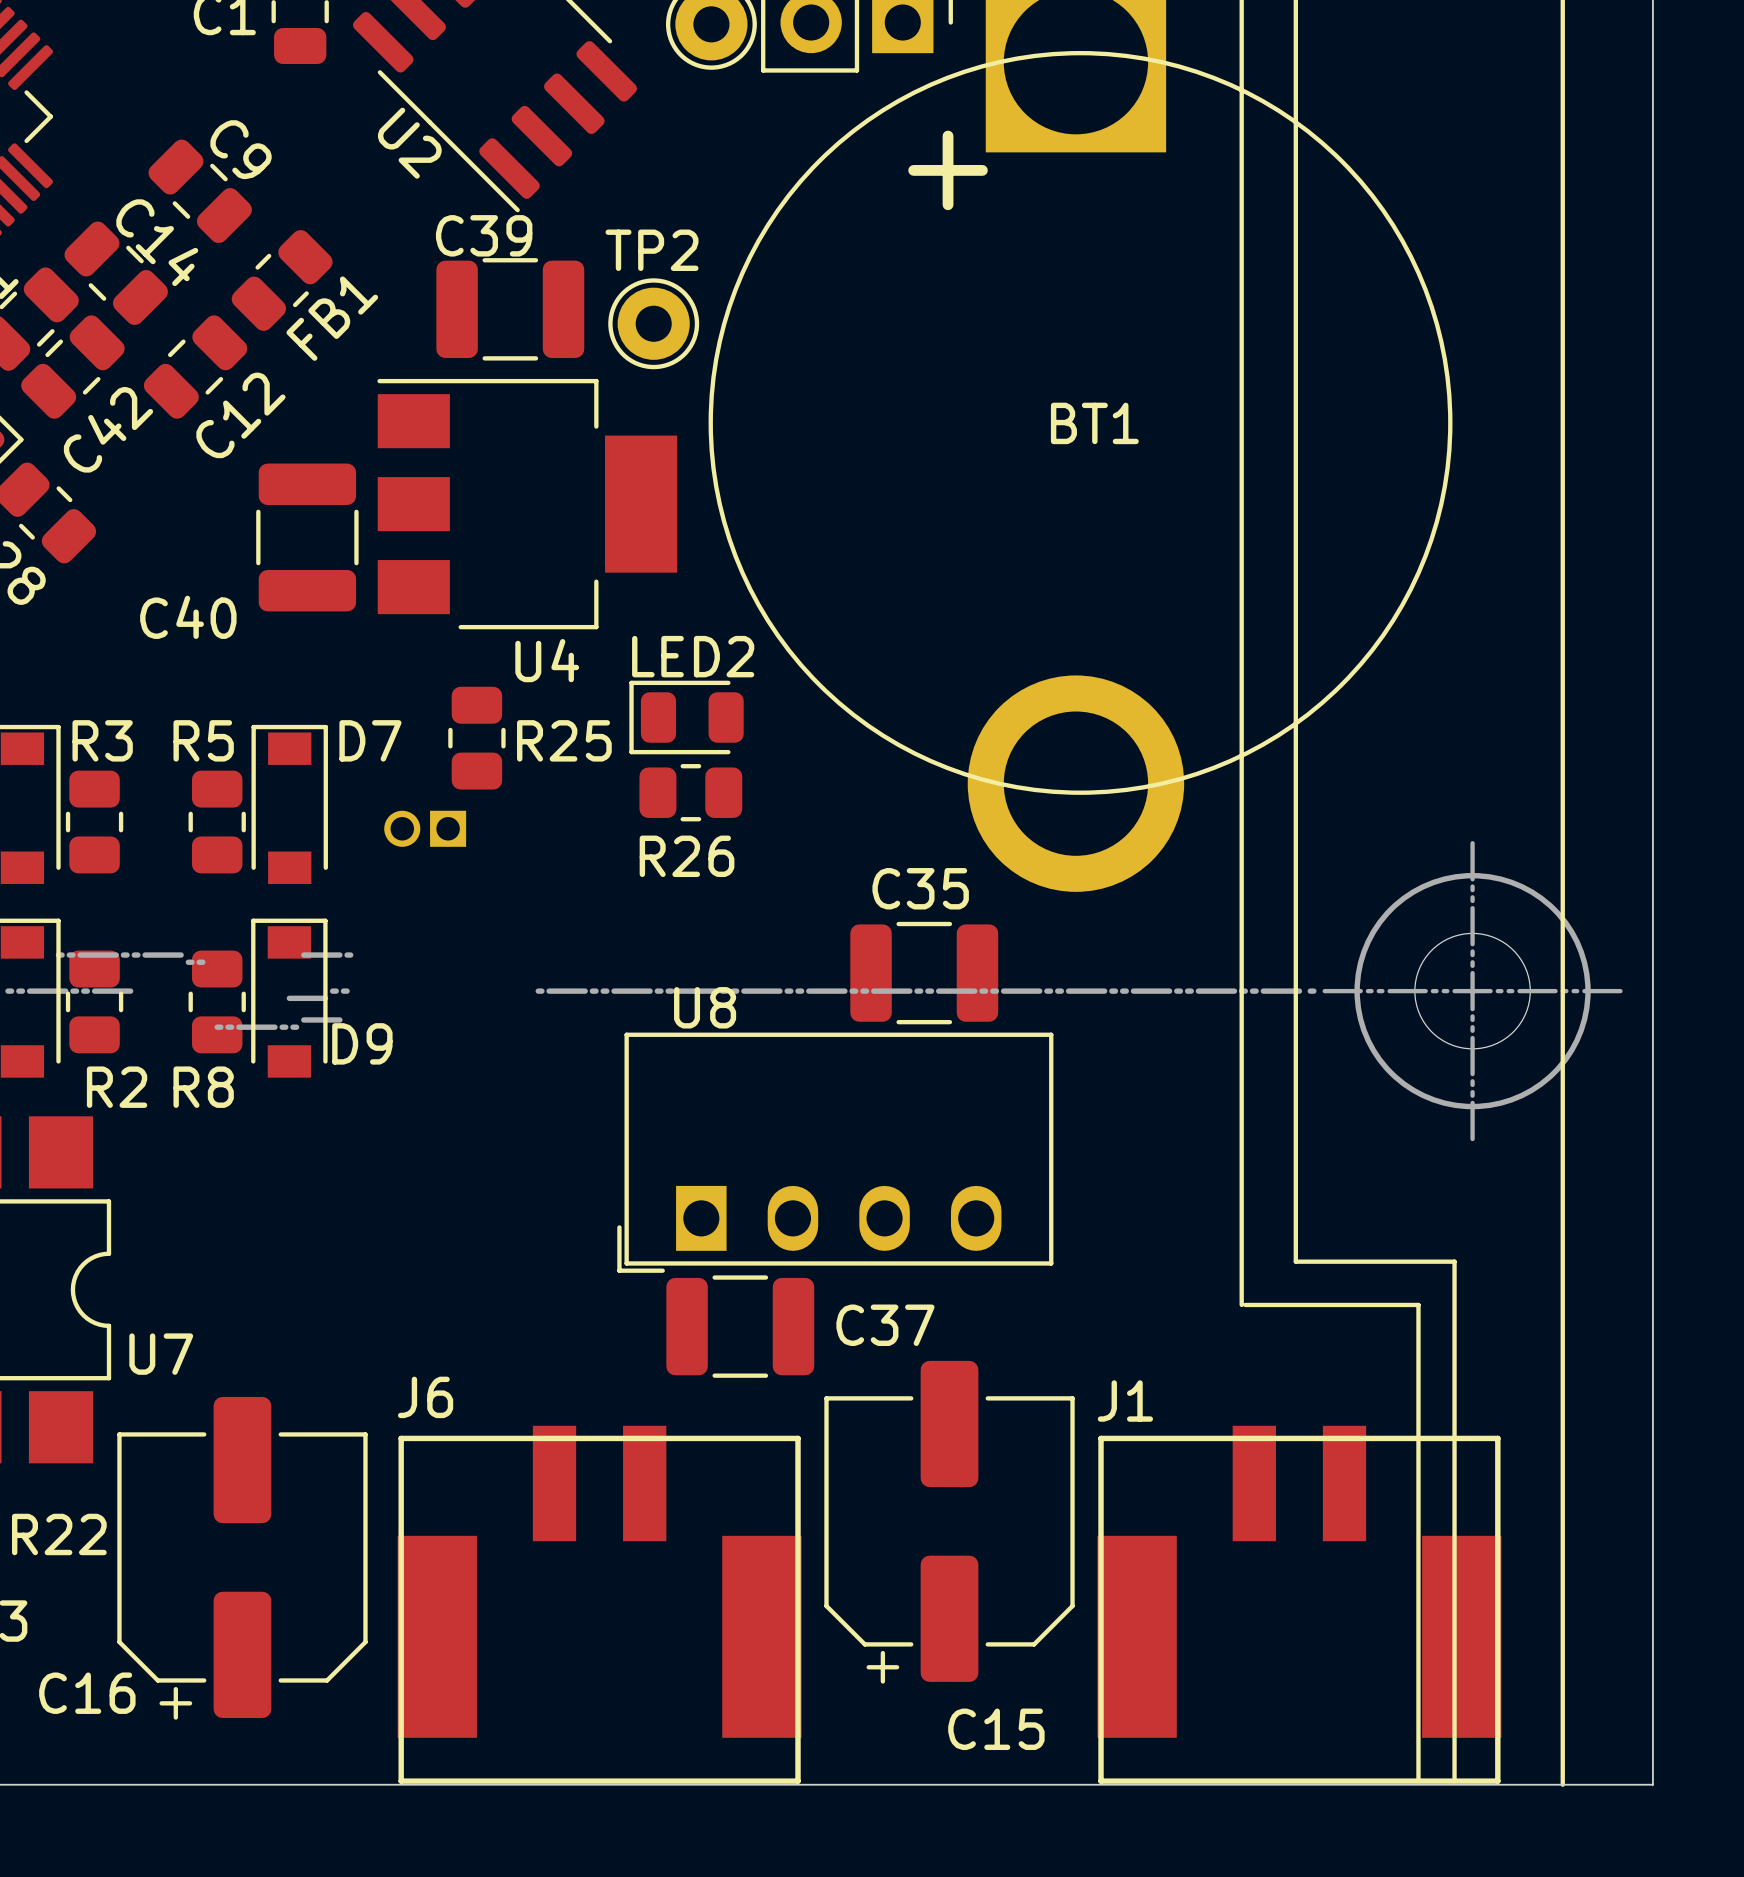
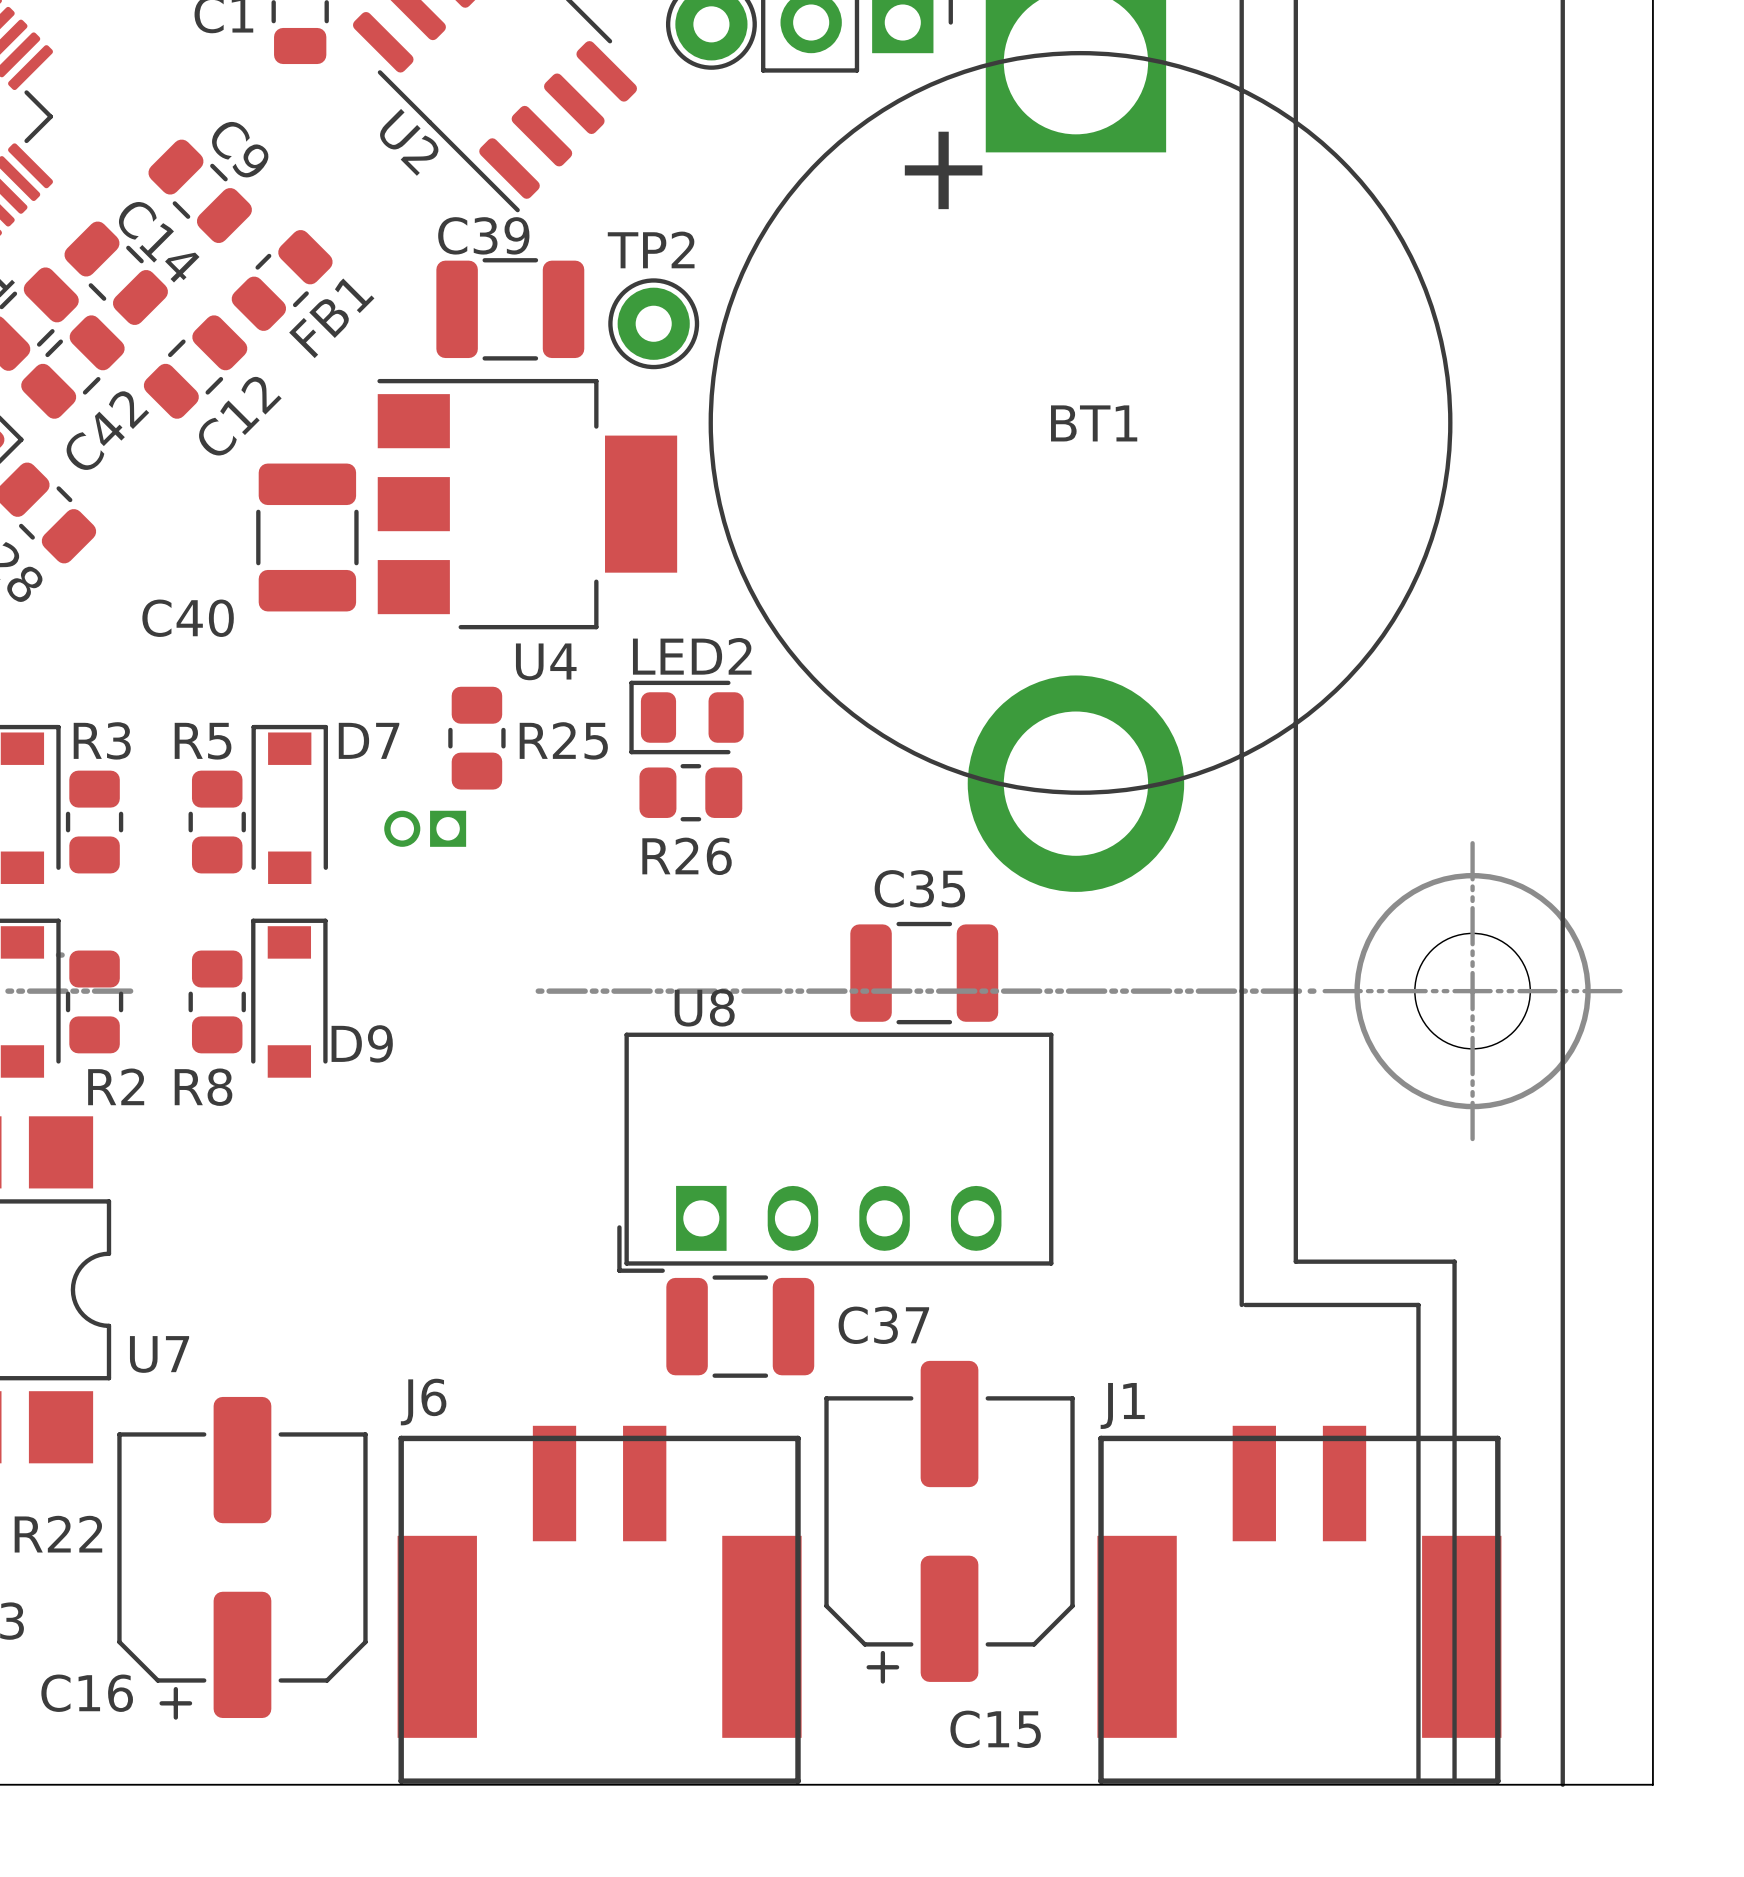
line: (69, 955) (72, 955) -> none
line: (80, 955) (116, 955) -> none
line: (123, 955) (127, 955) -> none
line: (134, 955) (137, 955) -> none
line: (145, 955) (181, 955) -> none
line: (303, 955) (339, 955) -> none
line: (347, 955) (350, 955) -> none
line: (188, 962) (191, 962) -> none
line: (199, 962) (202, 962) -> none
line: (332, 991) (336, 991) -> none
line: (343, 991) (347, 991) -> none
line: (289, 998) (325, 998) -> none
line: (303, 1019) (339, 1019) -> none
line: (217, 1027) (220, 1027) -> none
line: (228, 1027) (231, 1027) -> none
line: (238, 1027) (274, 1027) -> none
line: (282, 1027) (285, 1027) -> none
line: (292, 1027) (296, 1027) -> none

